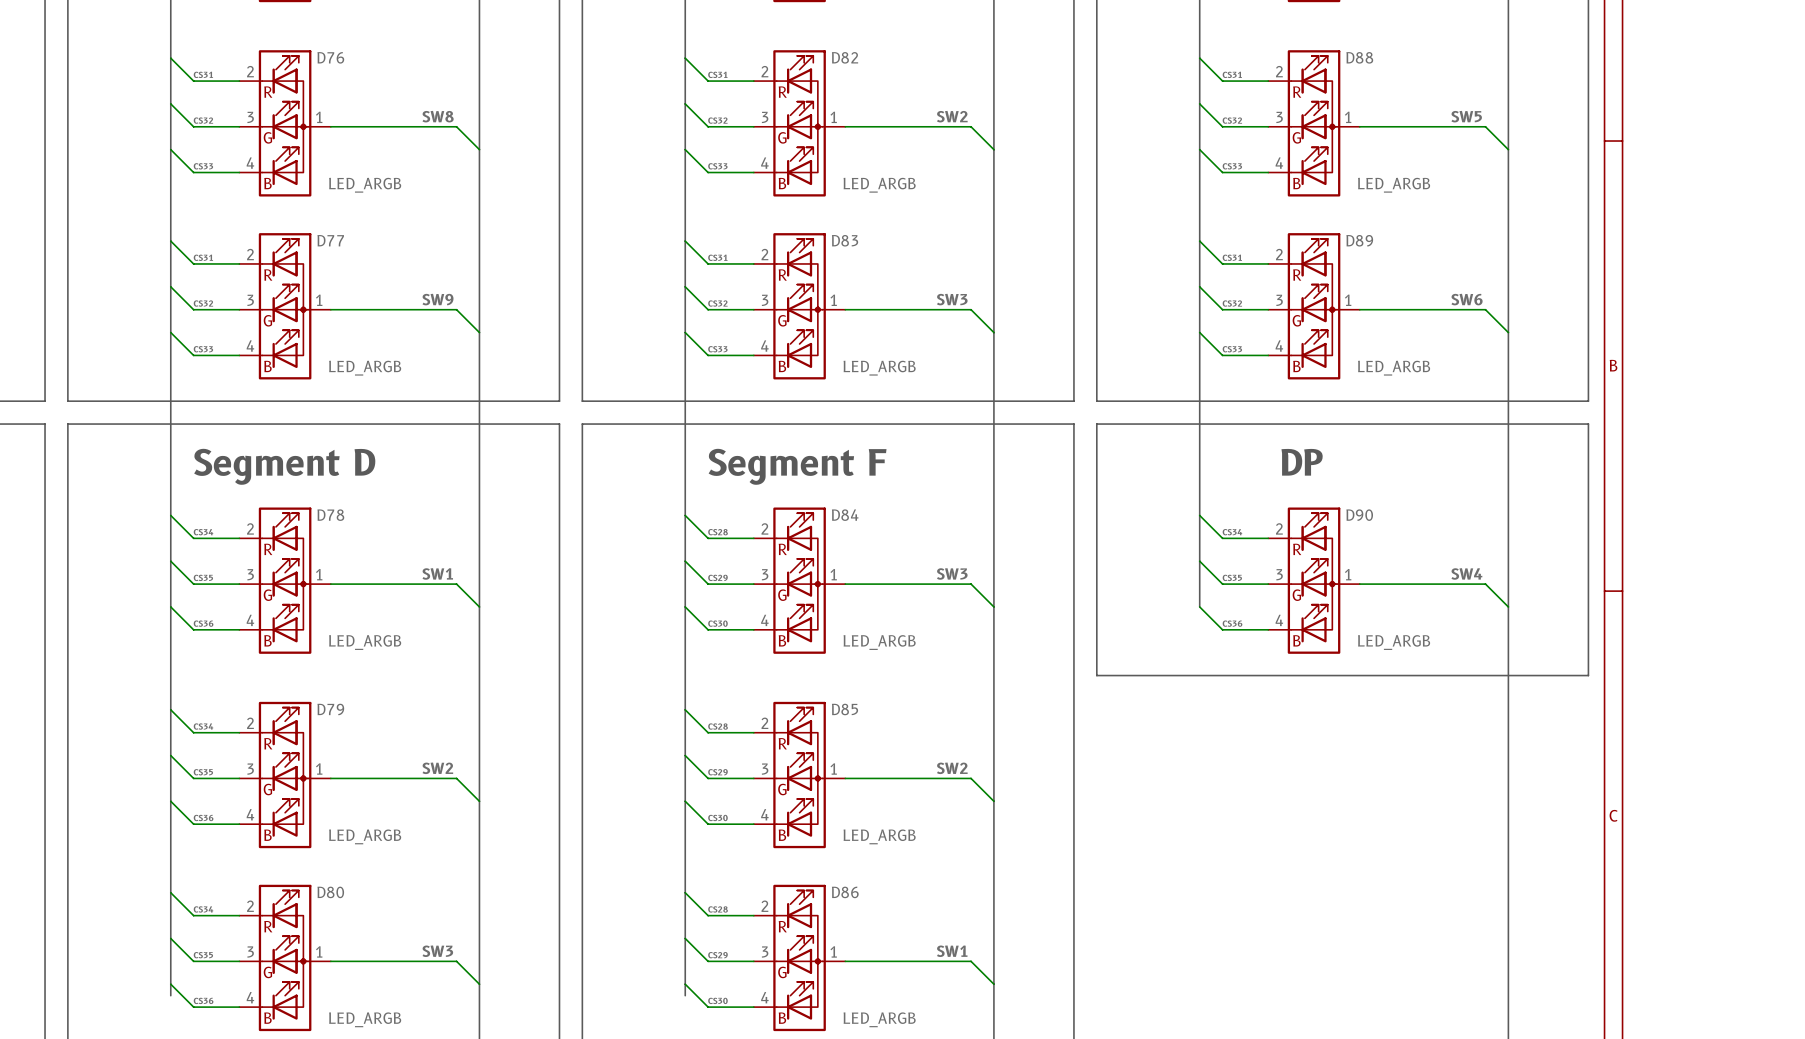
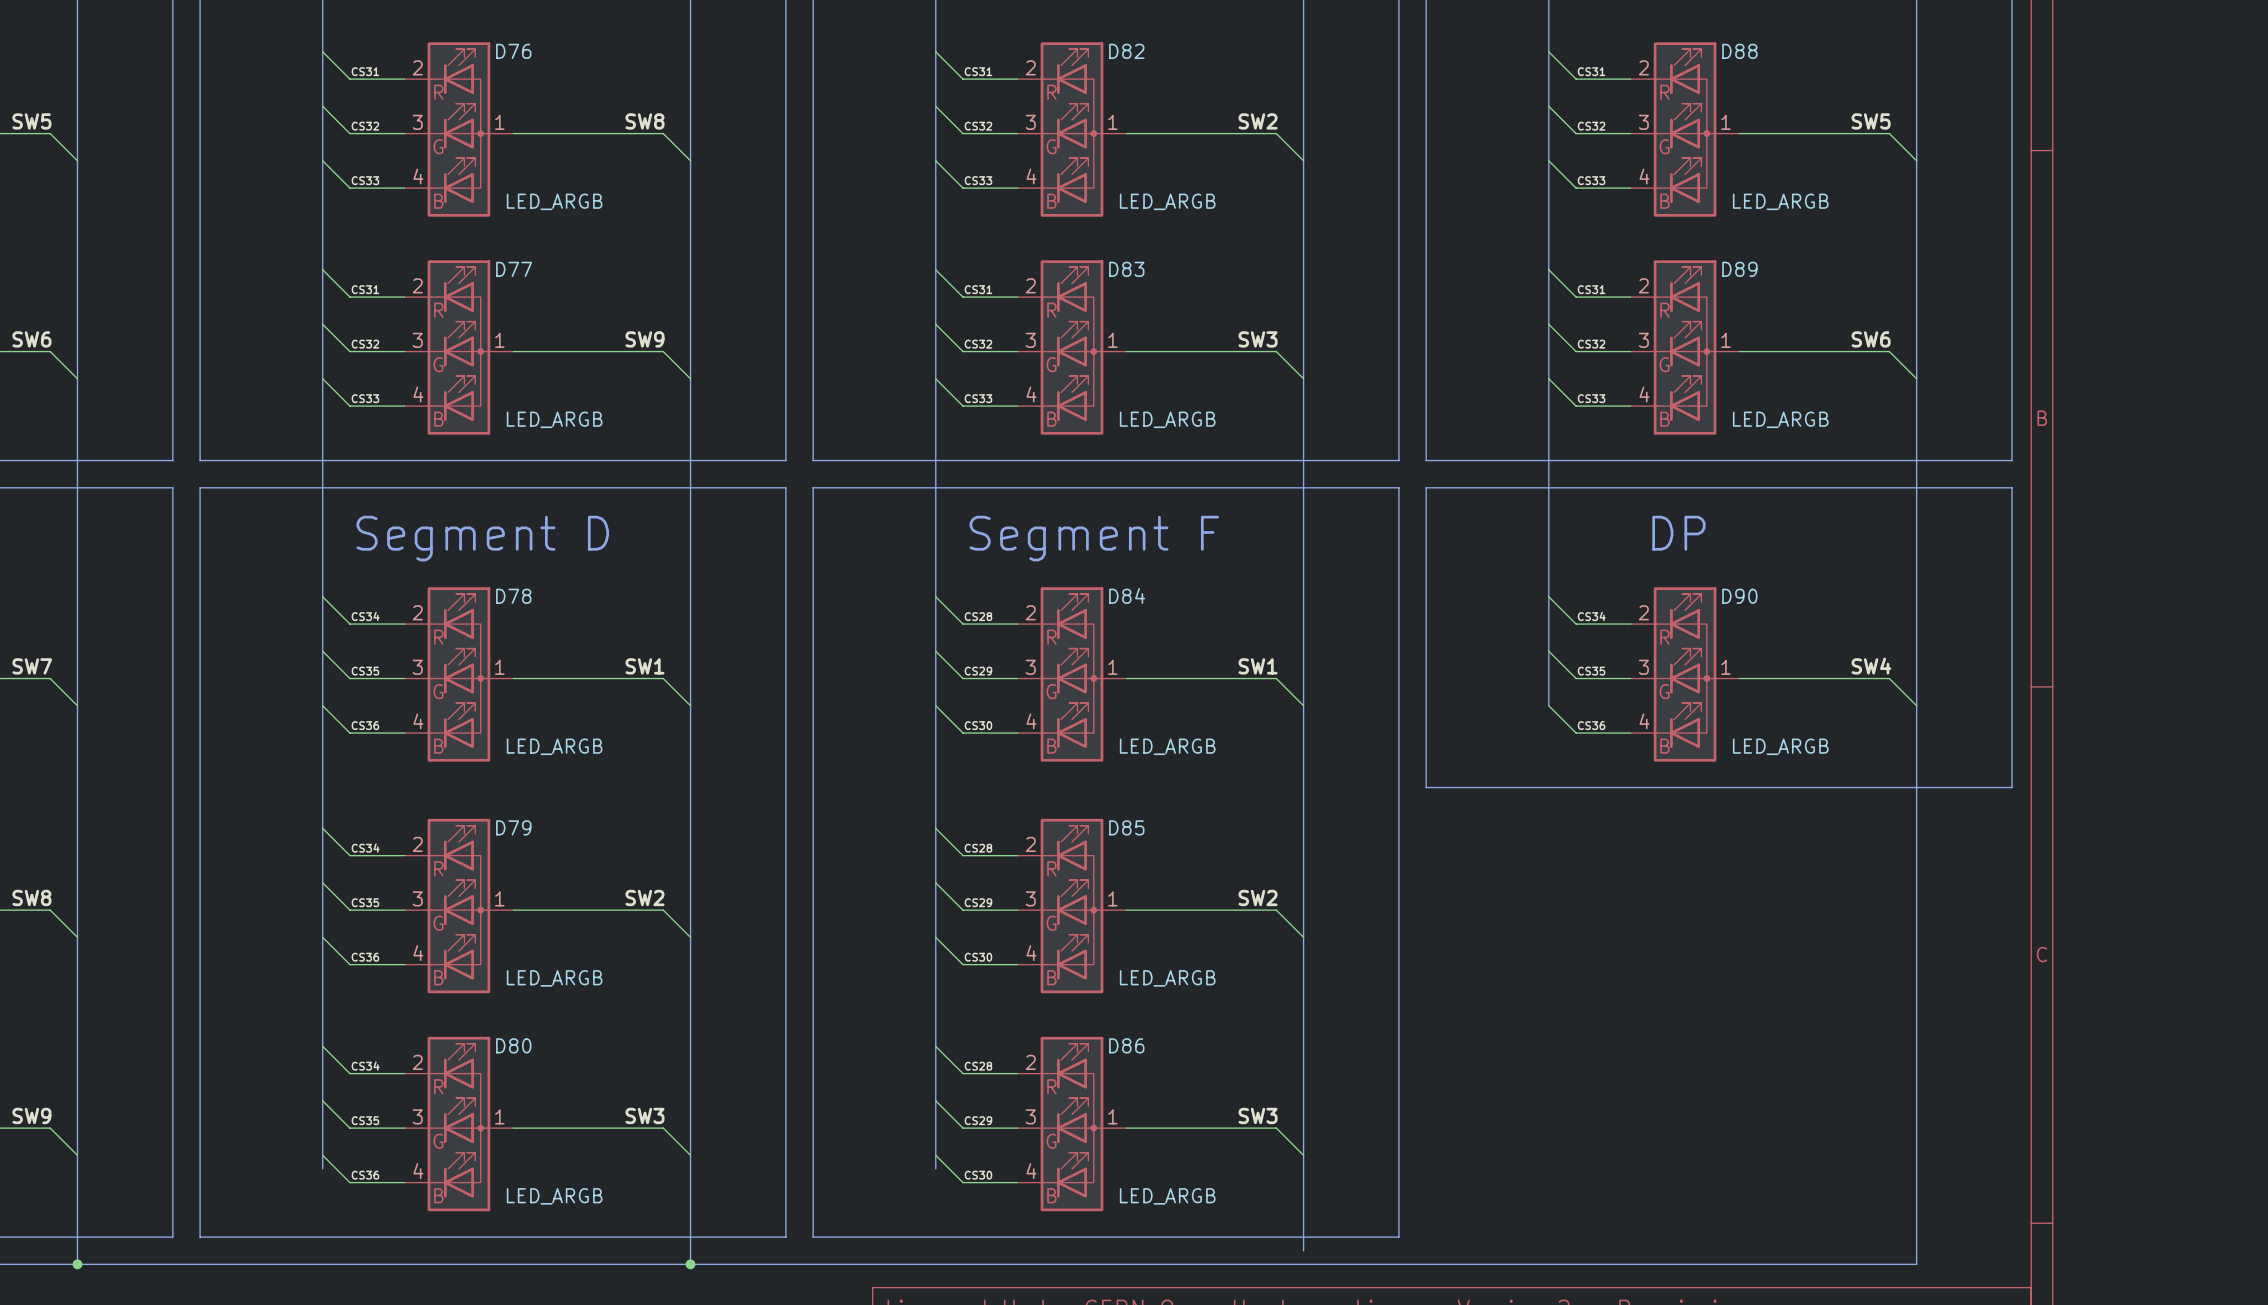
label: SW3 (952, 573) -> SW1 (1258, 666)
label: SW1 (952, 951) -> SW3 (1258, 1115)

